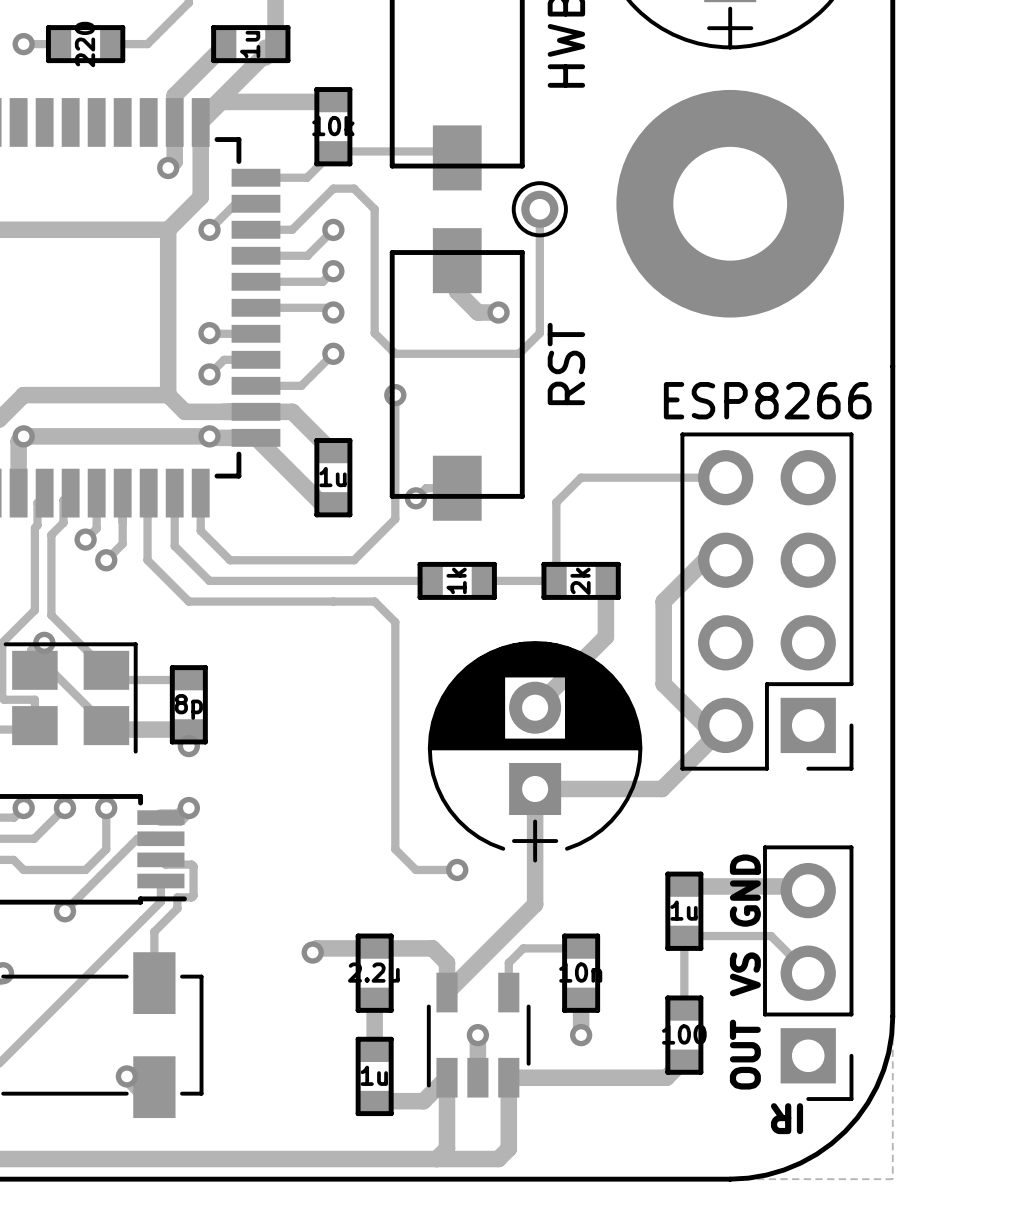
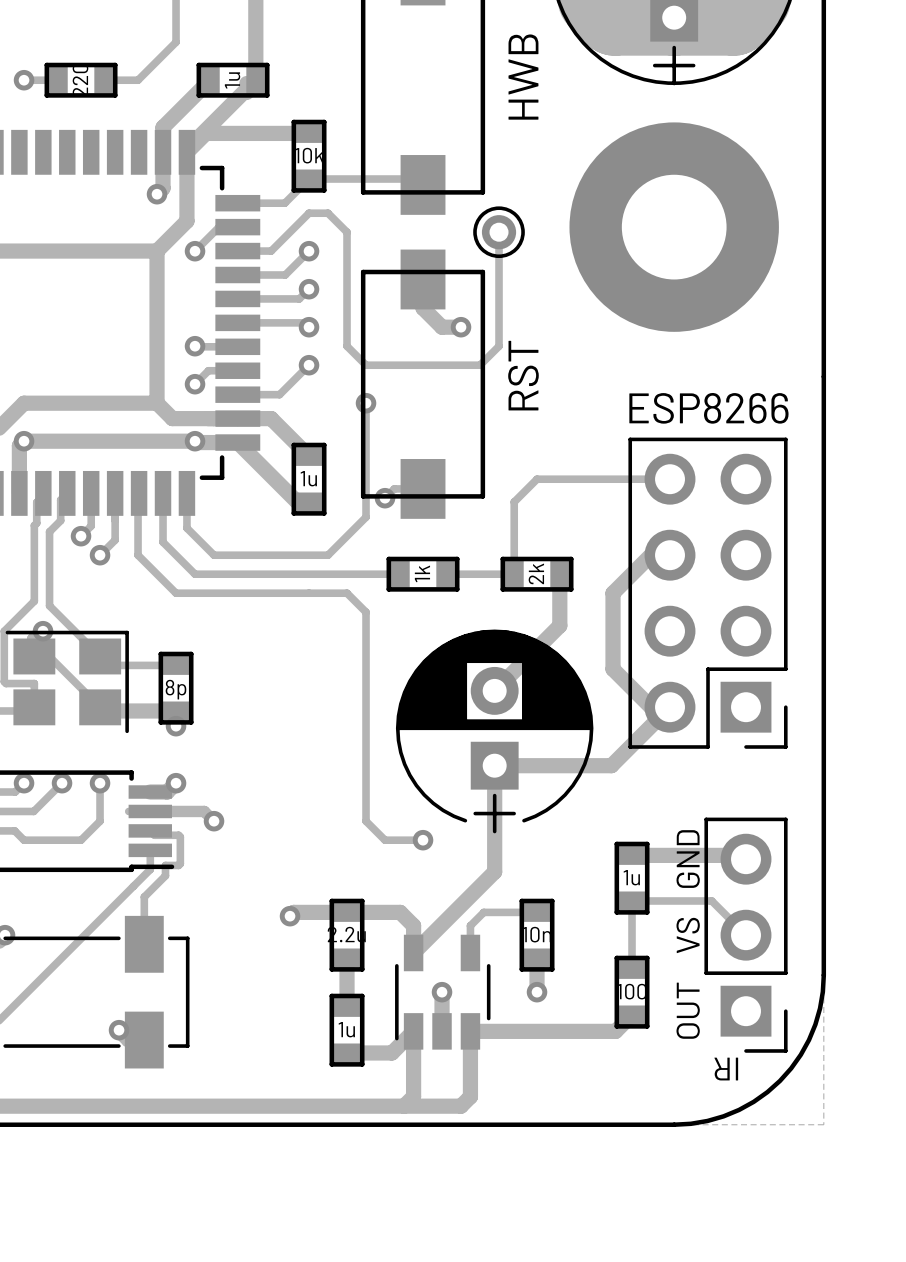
track: (137, 838) (64, 911) -> none
track: none -> (150, 811) (204, 811) (214, 821)
via position: (64, 911) -> (214, 821)

